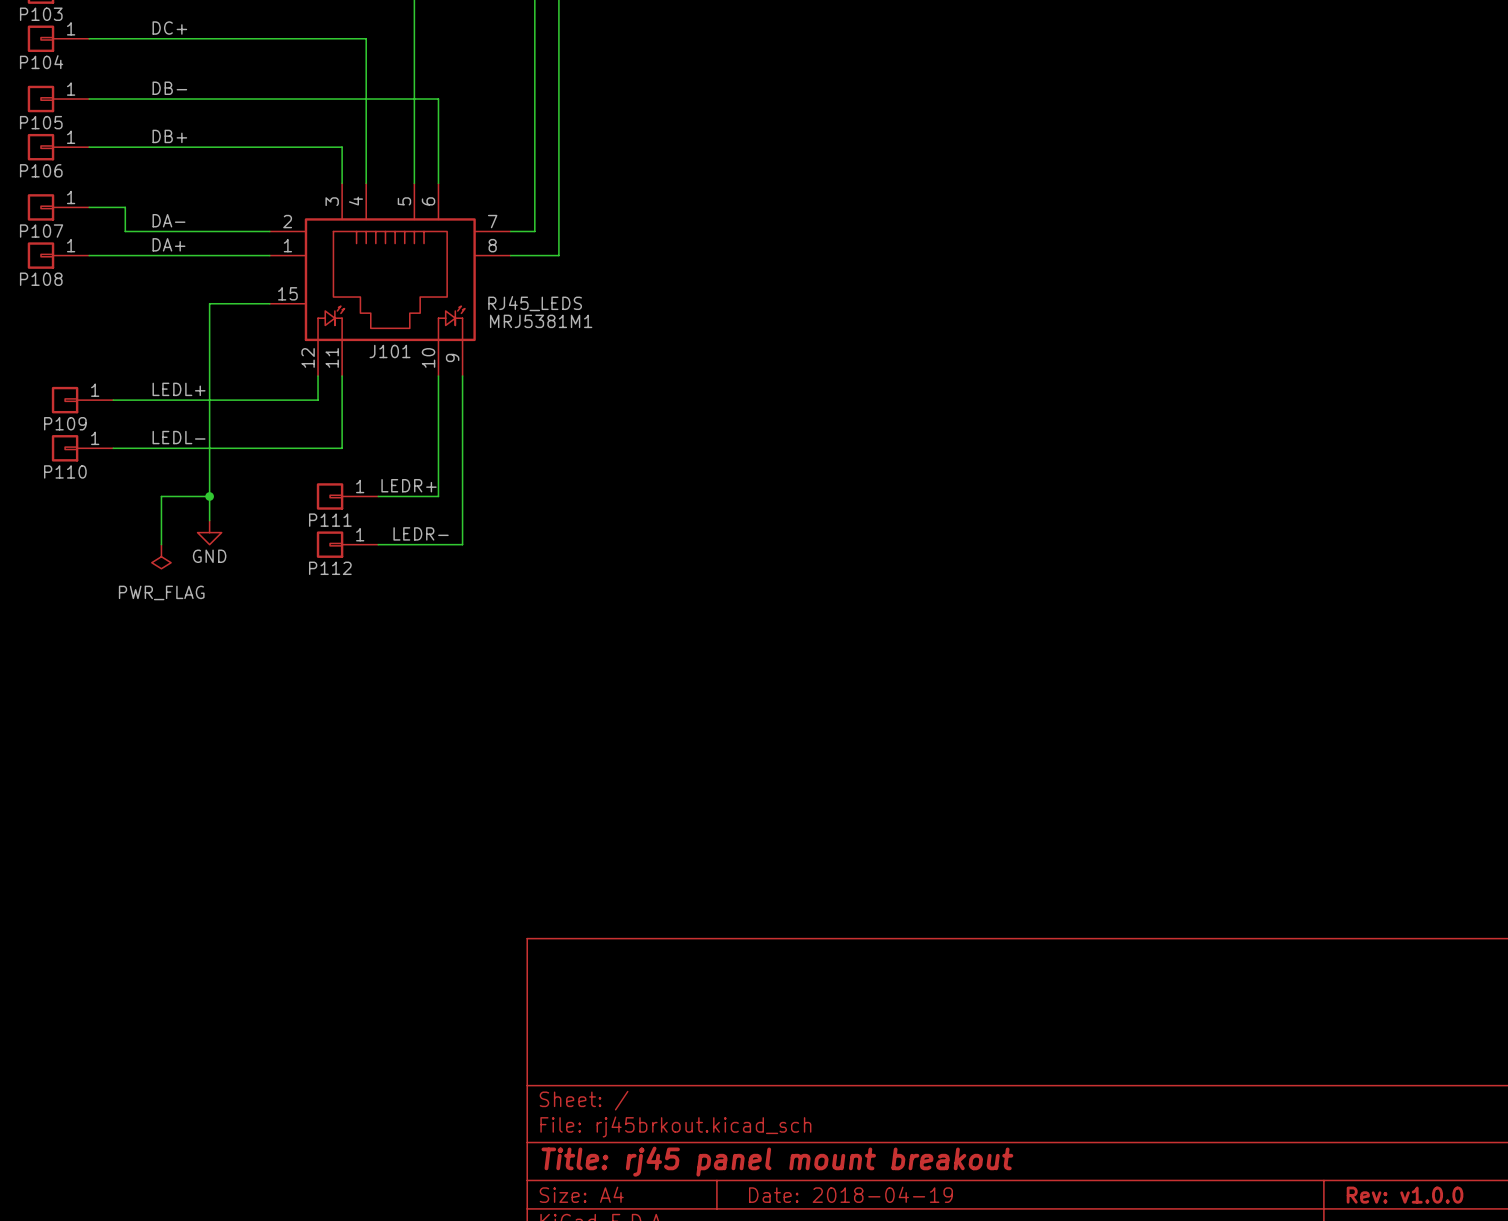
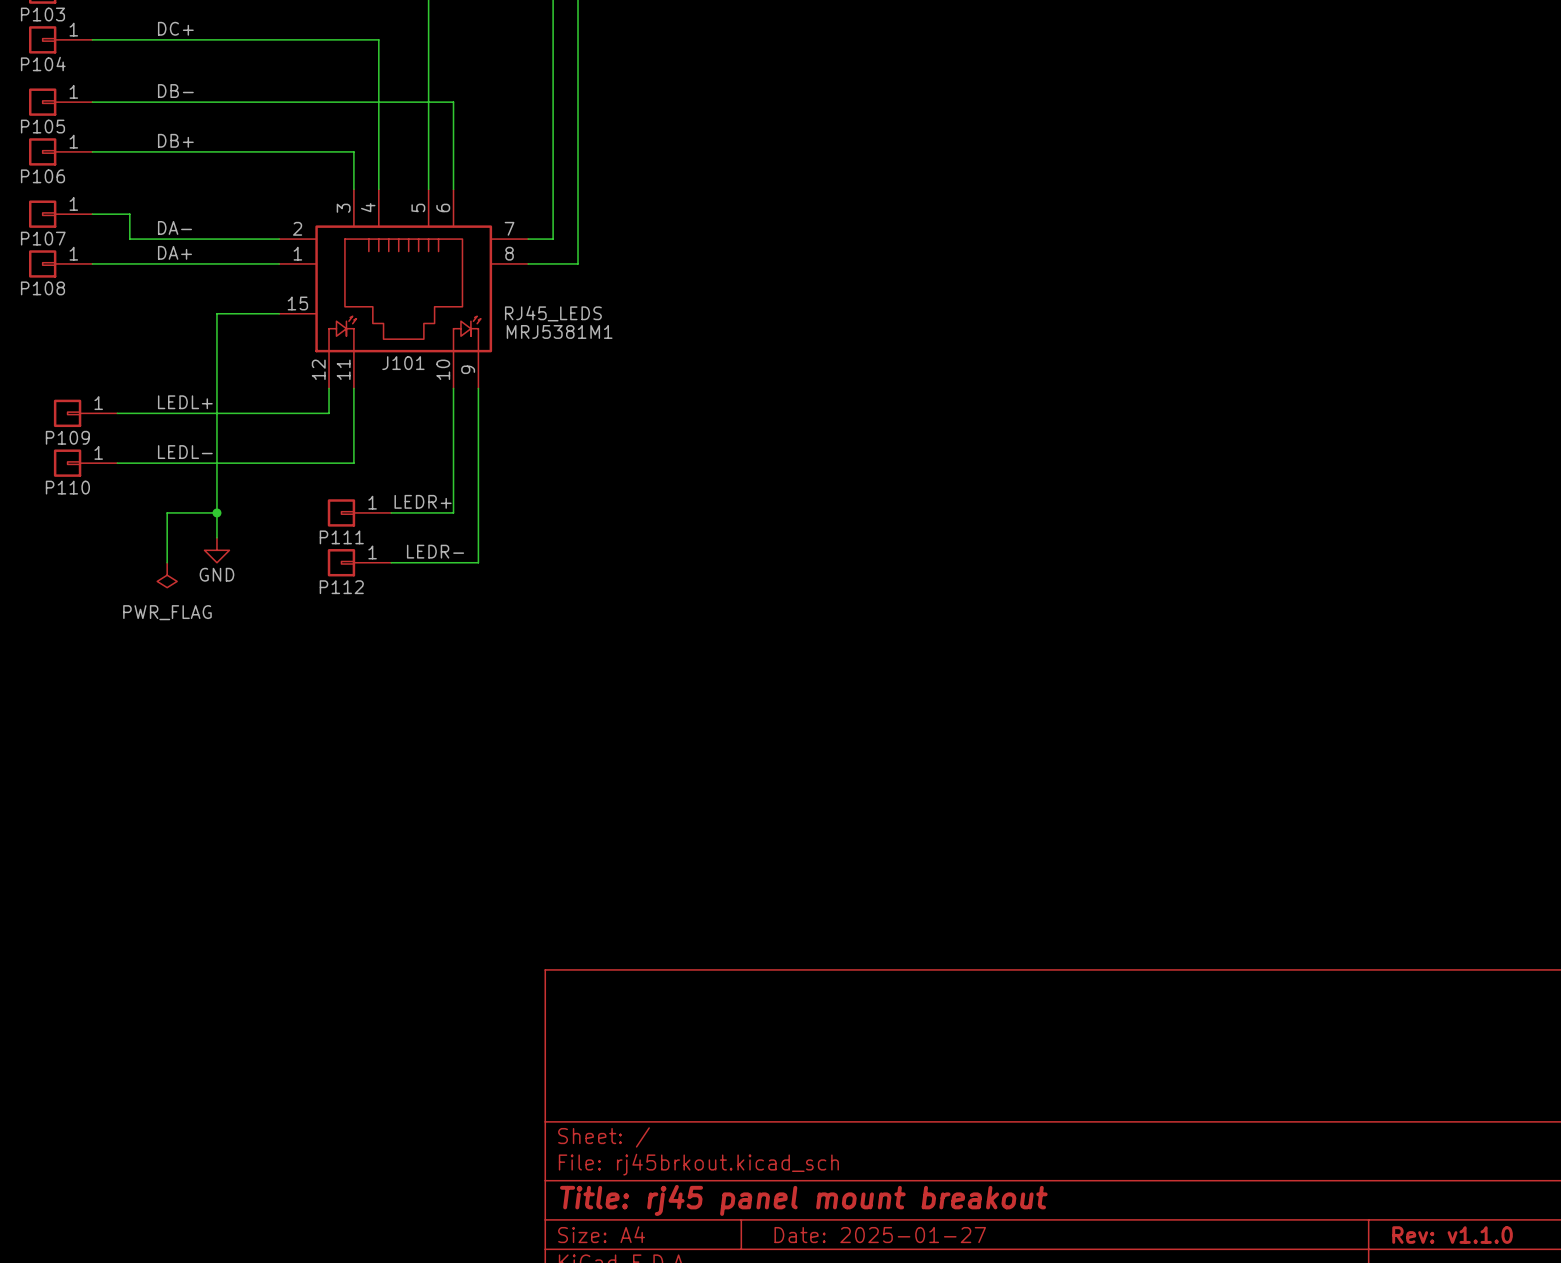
title block: Date: 2018-04-19 (850, 1194) -> Date: 2025-01-27 (880, 1235)
title block: Rev: v1.0.0 (1405, 1195) -> Rev: v1.1.0 (1452, 1235)

